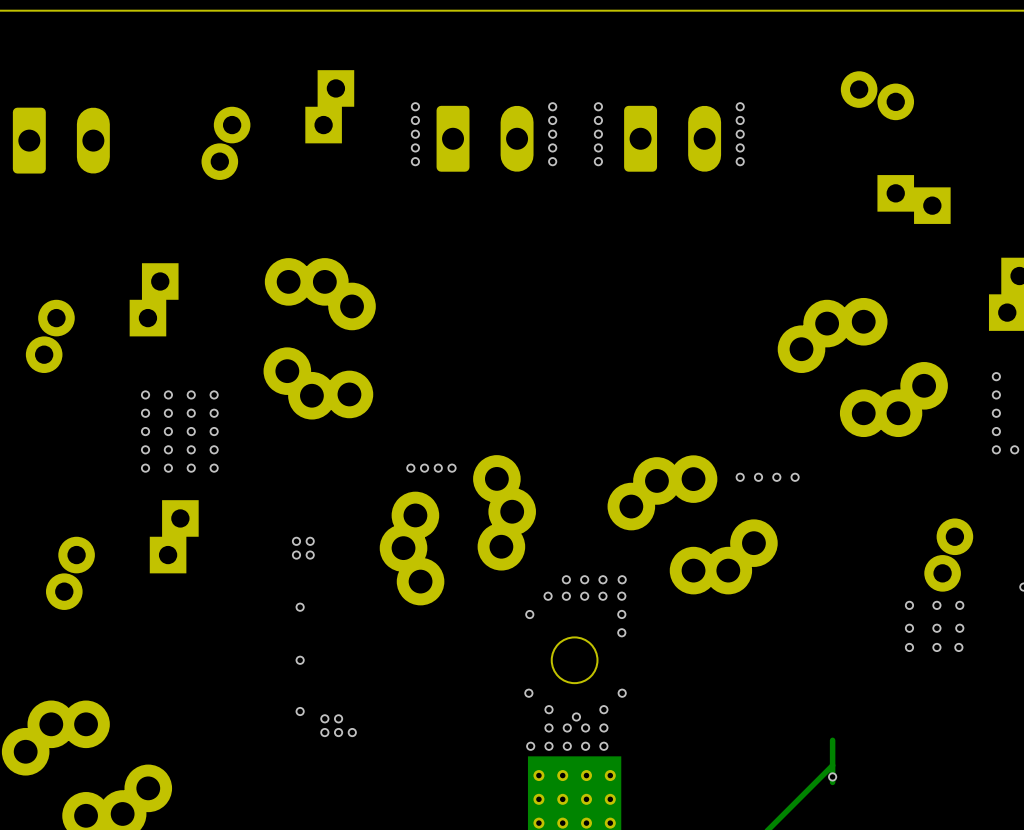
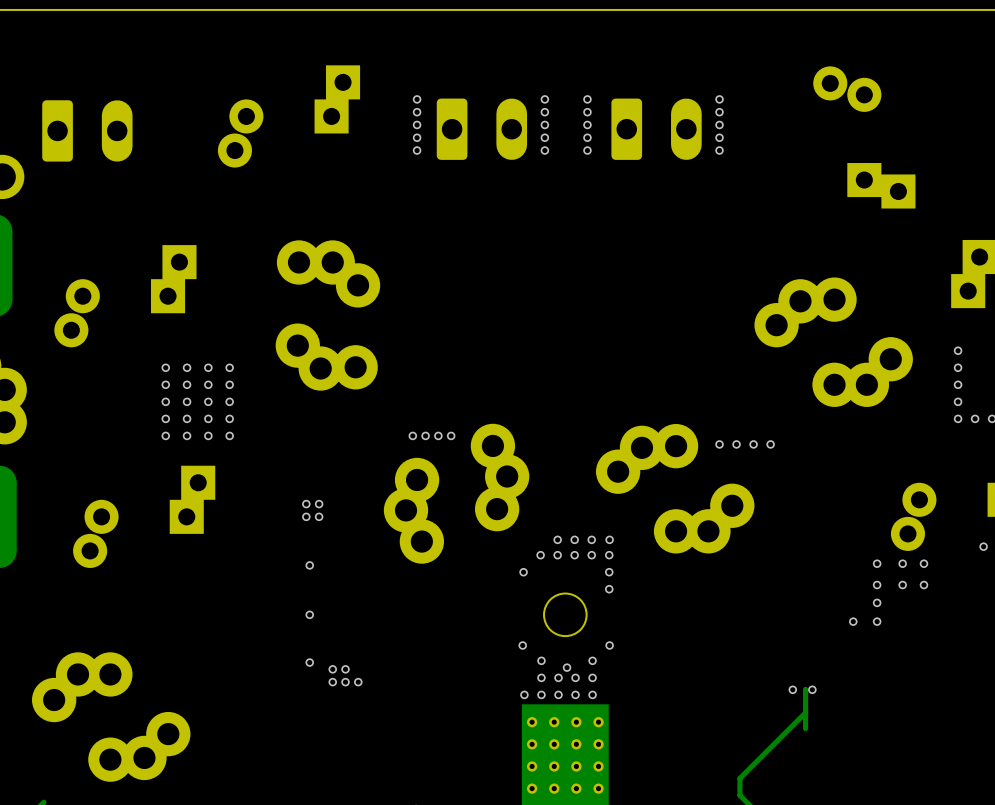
via: (936, 647) -> none
via: (958, 647) -> none
via: none -> (853, 621)
via: none -> (877, 621)
via: none -> (792, 689)
via: none -> (812, 689)
via: (832, 776) -> none

